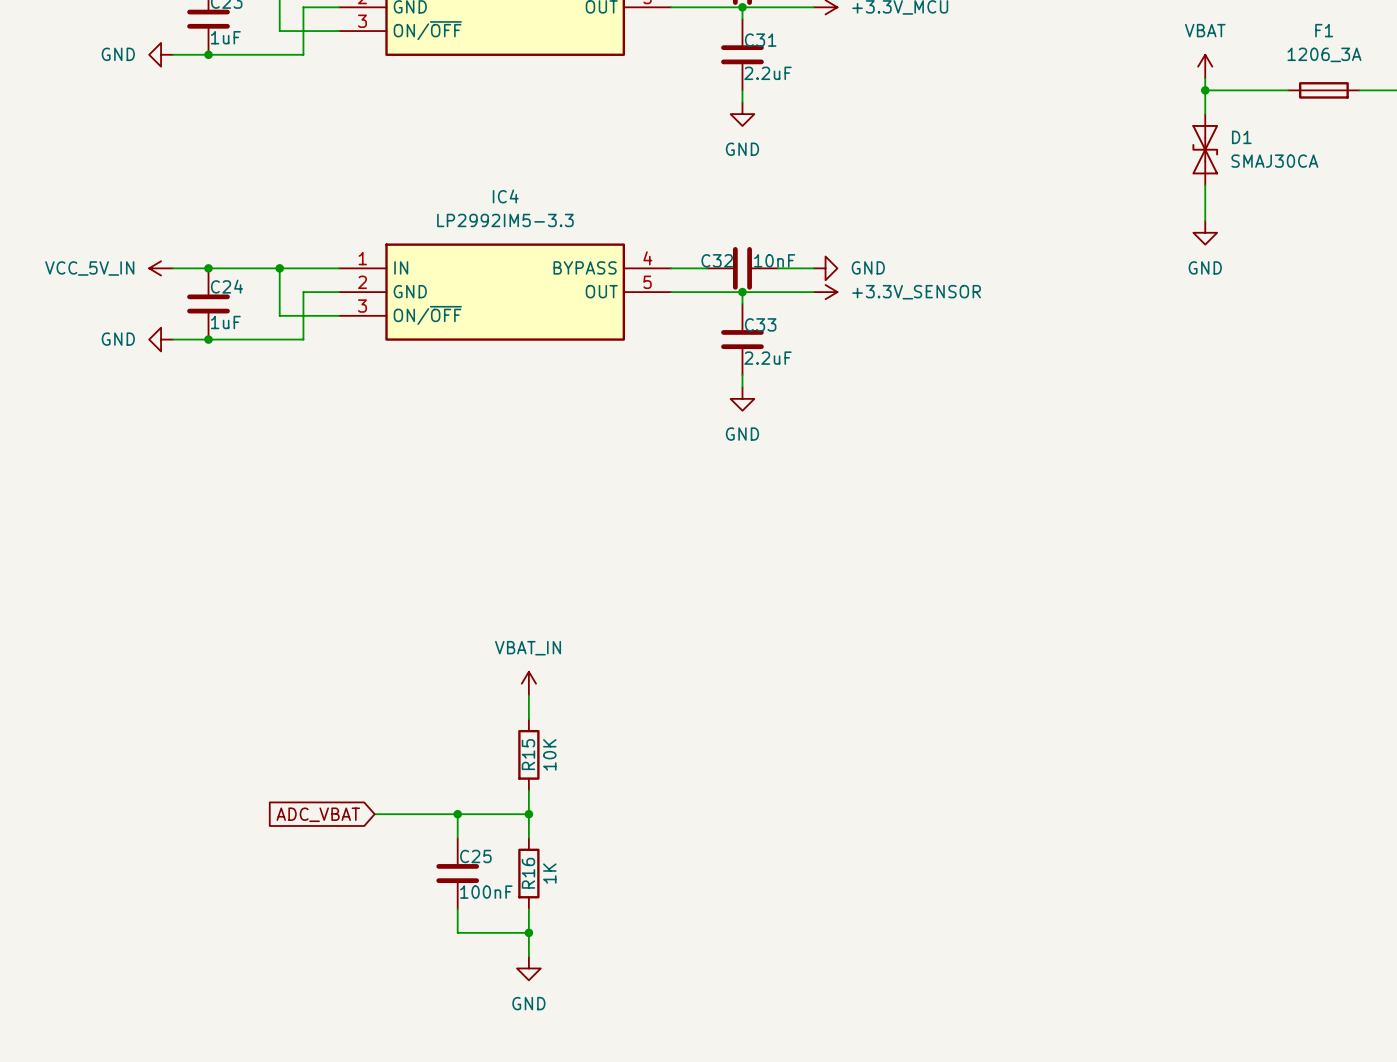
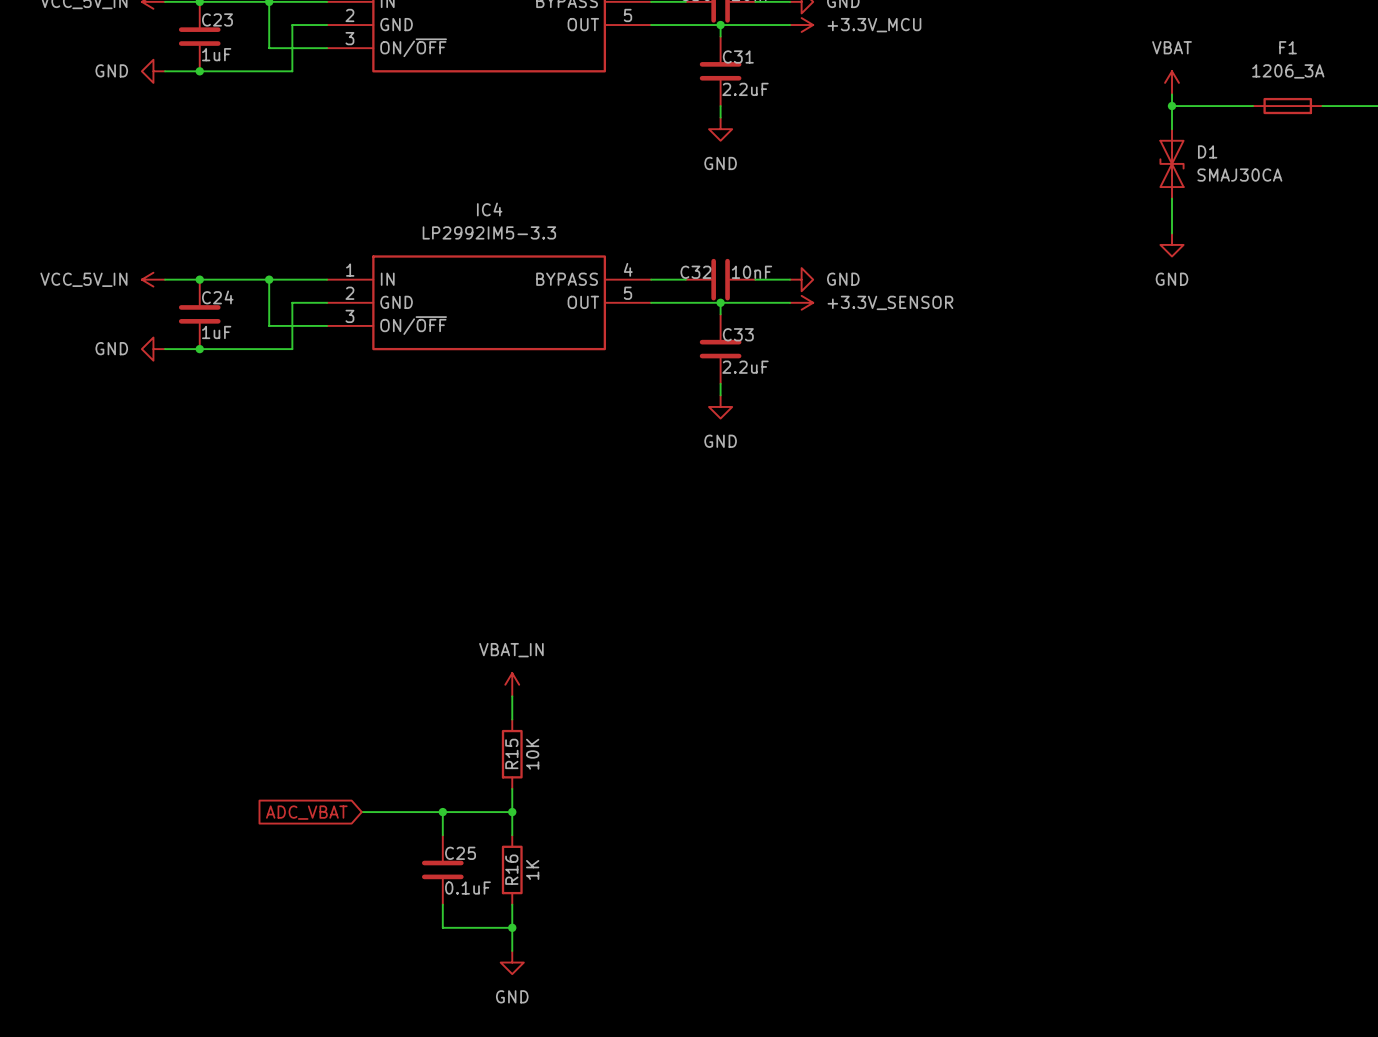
C25 value: 100nF (486, 892) -> 0.1uF (467, 888)

